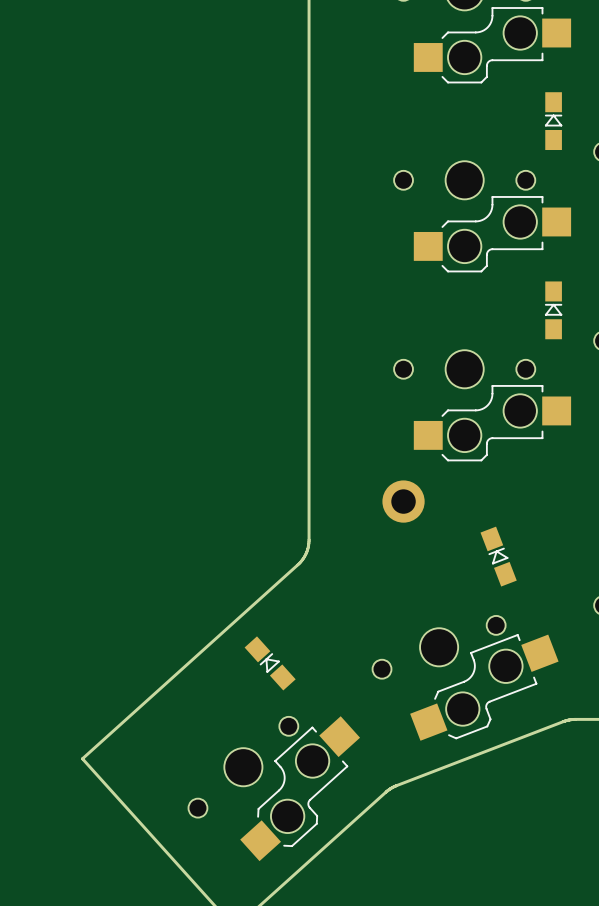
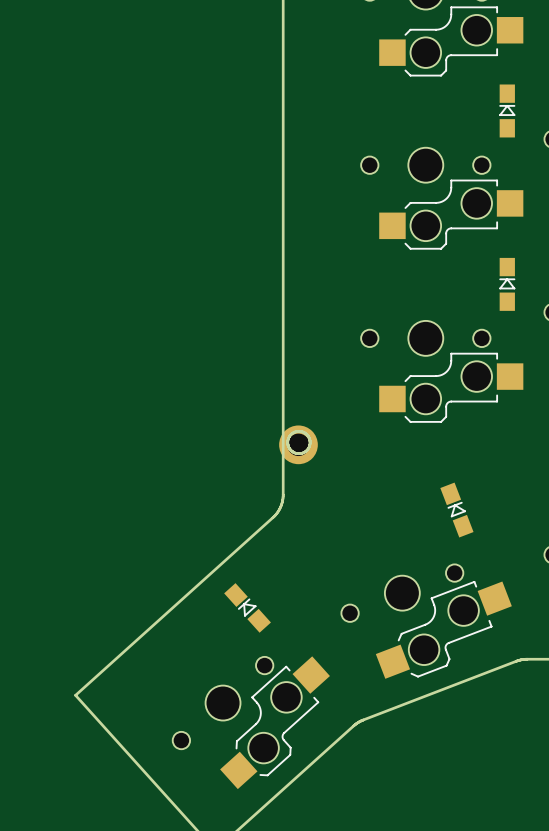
board edge: none -> (299, 431) (307, 435) (310, 443) (306, 450) (298, 453) (290, 449) (287, 441) (291, 434) (299, 431)
part position: (403, 501) -> (298, 444)

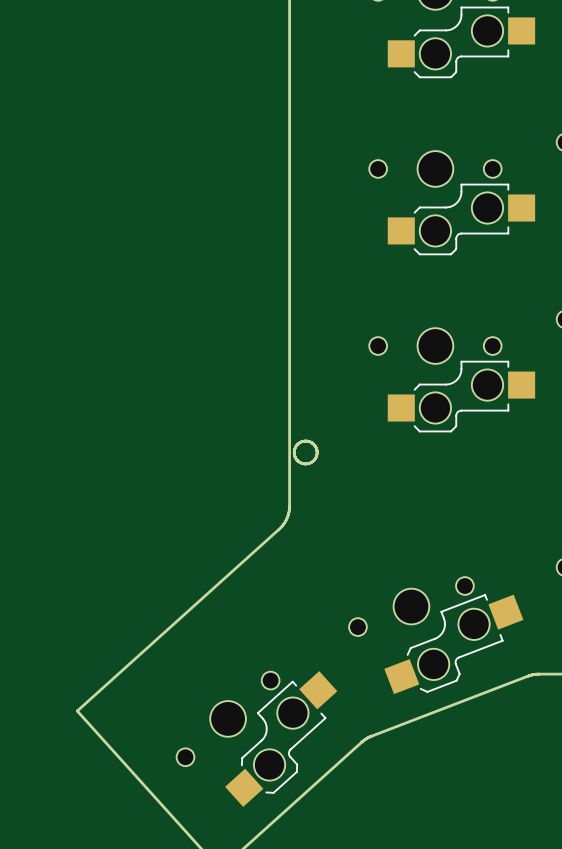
part: (507, 110) -> none
part: (507, 284) -> none
part: (298, 444) -> none
part: (456, 510) -> none
part: (247, 607) -> none

